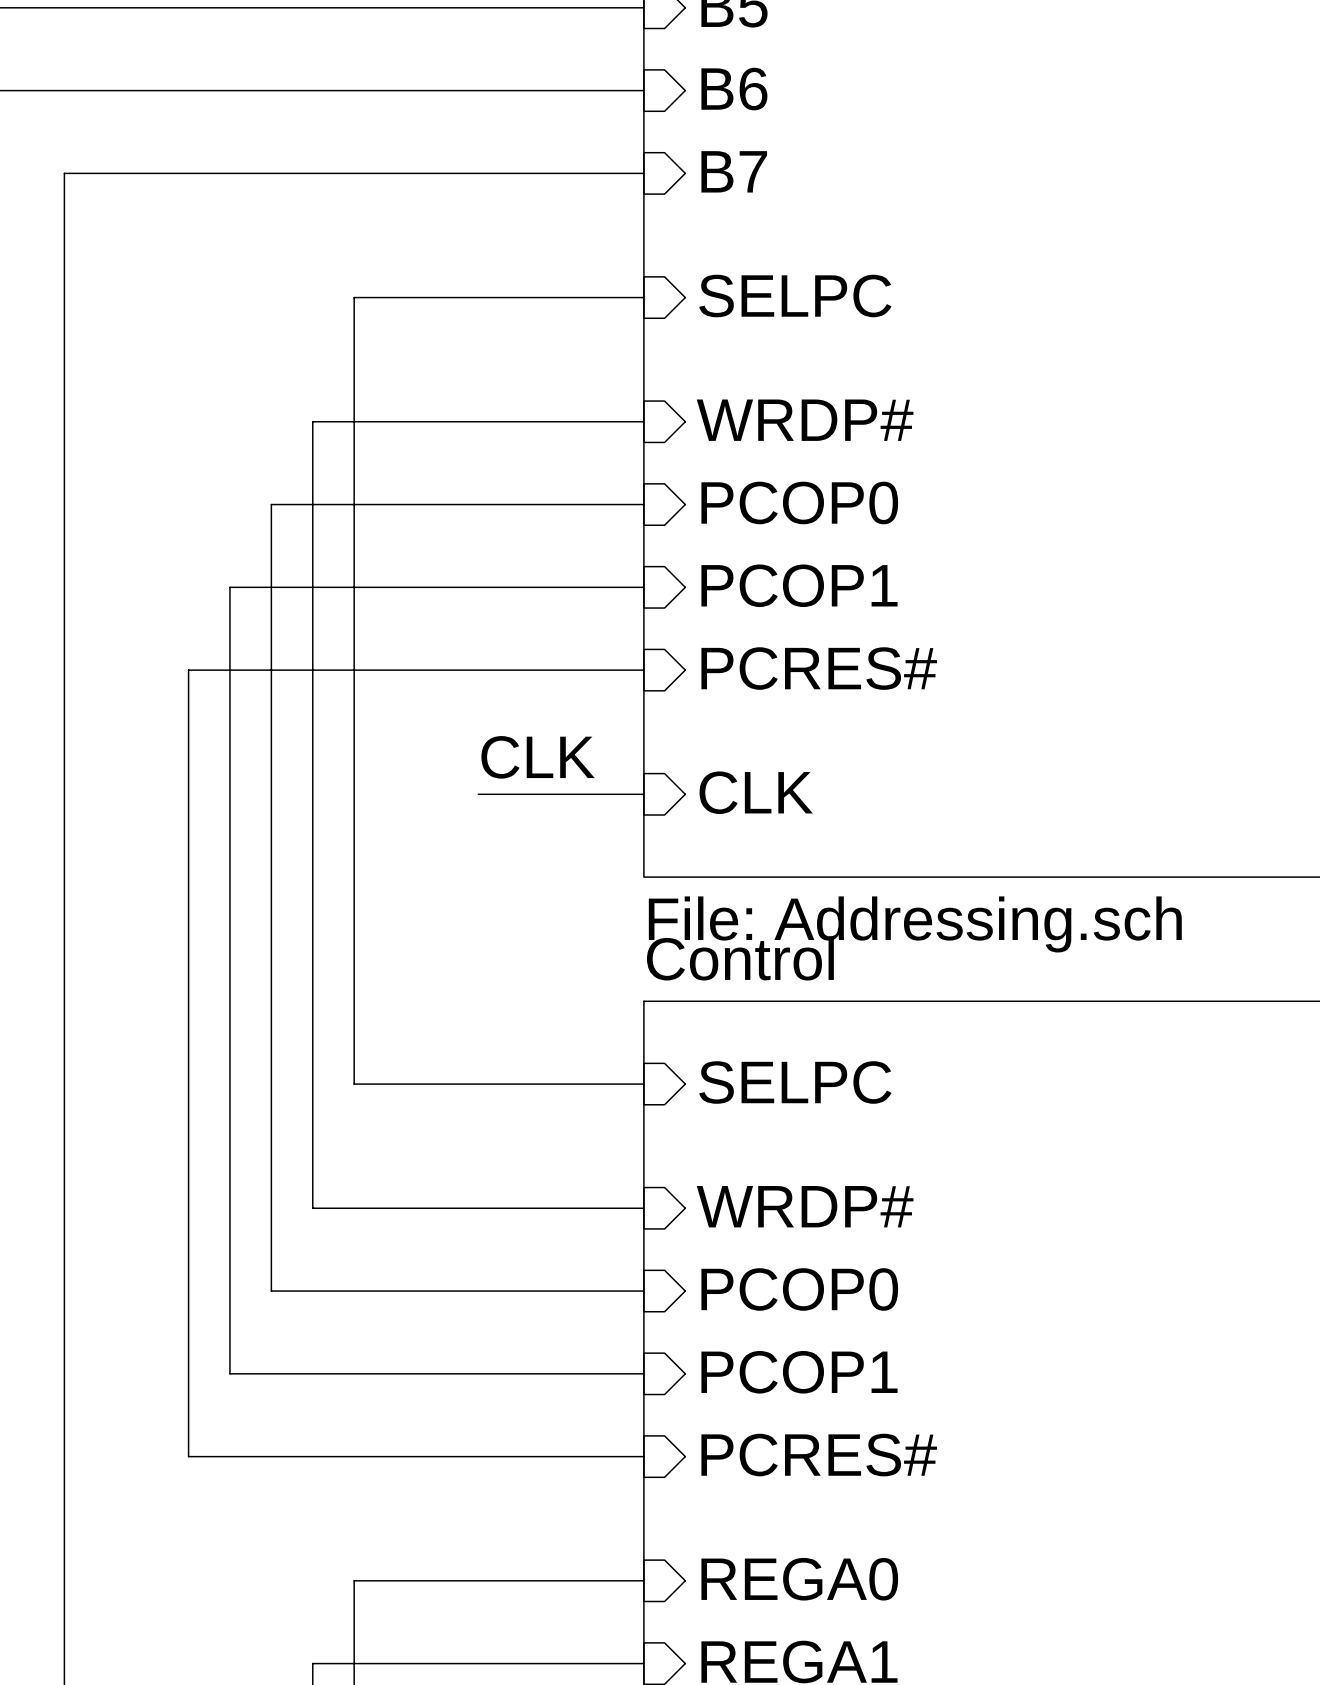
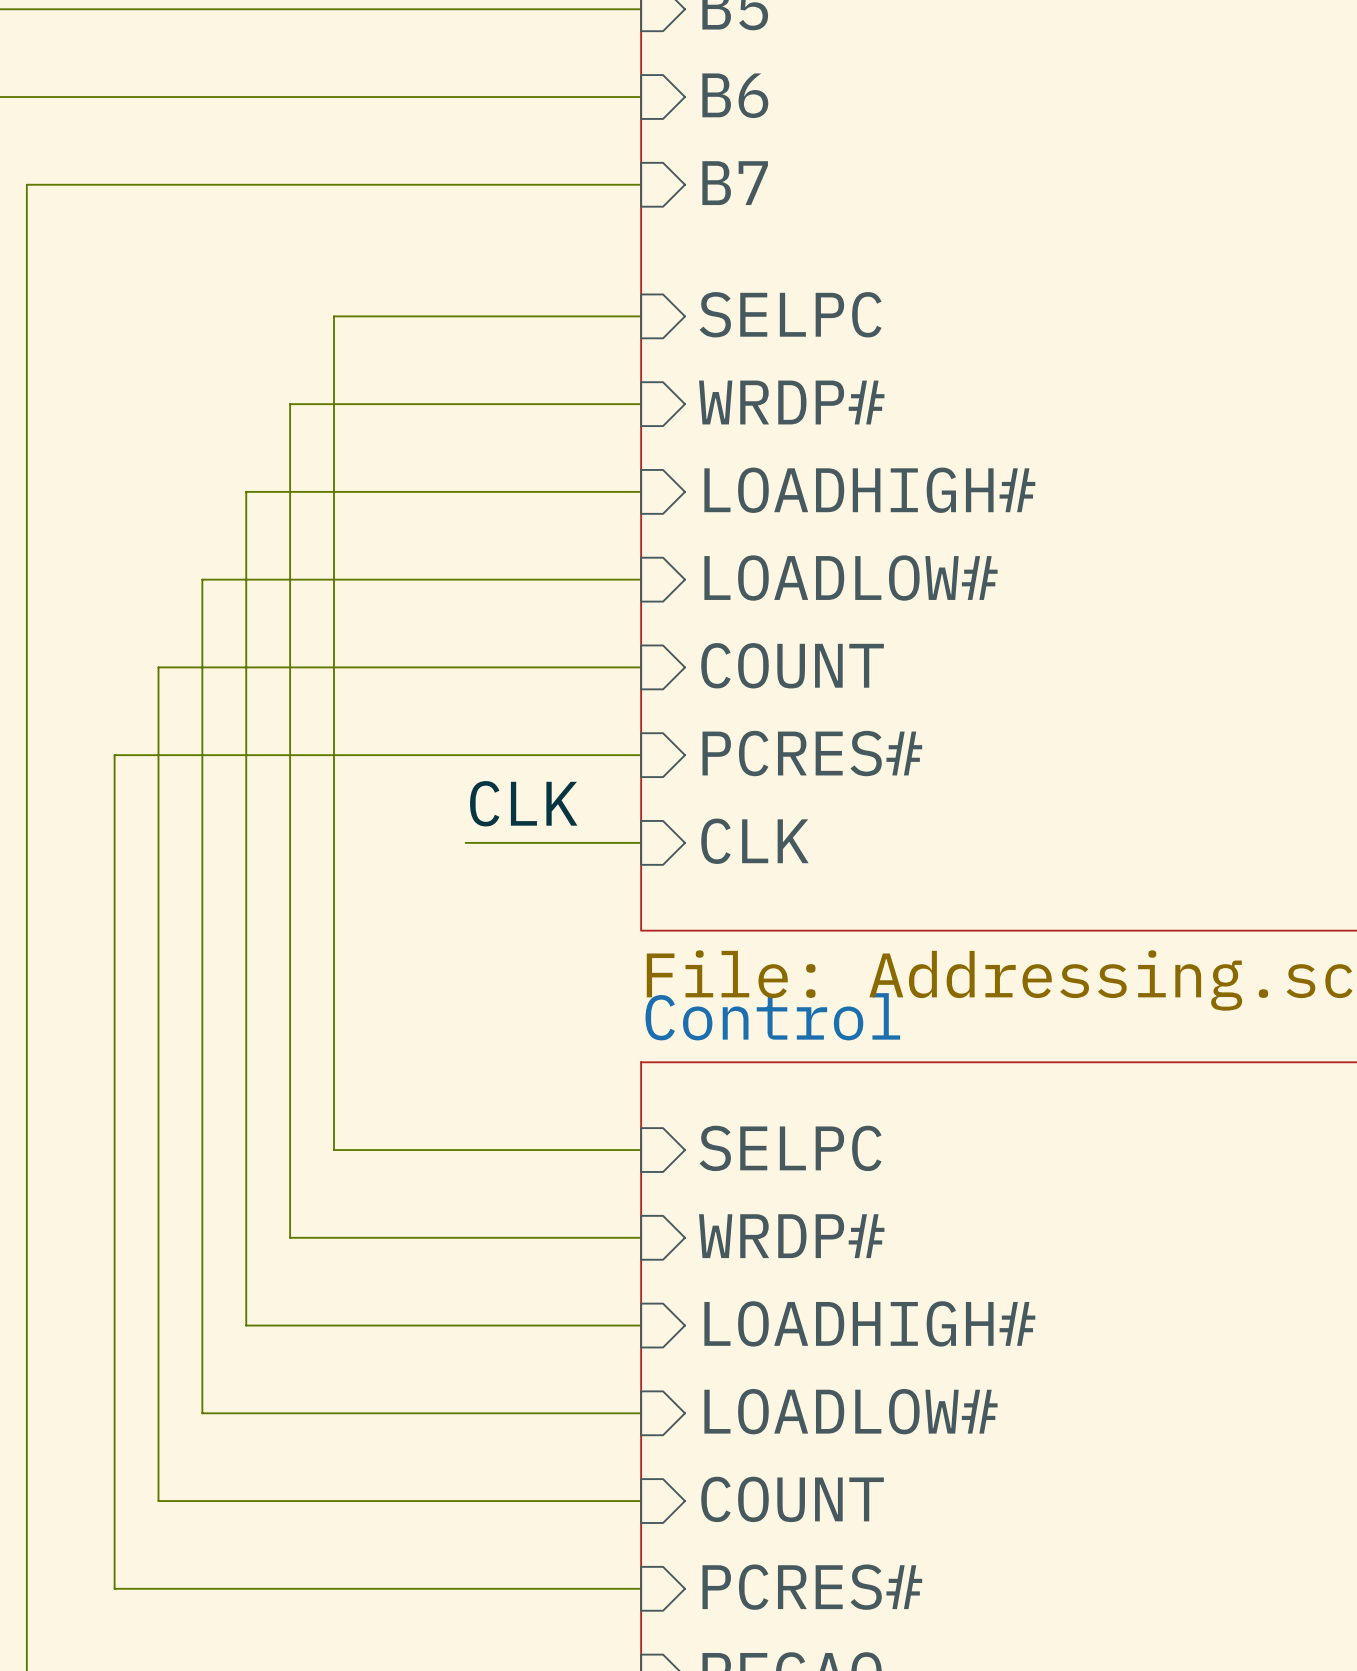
sheet pin position: WRDP# (805, 420) -> WRDP# (791, 402)
wire: (312, 421) (643, 421) -> (290, 448) (290, 404) (641, 404)
sheet pin: none -> LOADHIGH# (869, 490)
sheet pin: PCOP0 (799, 502) -> none
wire: (271, 504) (643, 504) -> (246, 535) (246, 491) (641, 491)
sheet pin: none -> LOADLOW# (850, 578)
sheet pin: PCOP1 (799, 585) -> none
wire: (229, 587) (643, 587) -> (202, 623) (202, 579) (641, 579)
sheet pin: none -> COUNT (792, 665)
sheet pin position: PCRES# (819, 668) -> PCRES# (812, 753)
wire: (188, 670) (643, 670) -> (158, 711) (158, 667) (641, 667)
wire: none -> (641, 755) (114, 755) (114, 1588) (641, 1588)
wire: (312, 1166) (312, 1208) (643, 1208) -> (290, 1237) (641, 1237)
sheet pin position: WRDP# (805, 1206) -> WRDP# (791, 1236)
sheet pin: none -> LOADHIGH# (869, 1323)
wire: (271, 1249) (271, 1291) (643, 1291) -> (246, 1325) (641, 1325)
sheet pin: PCOP0 (799, 1289) -> none
sheet pin: none -> LOADLOW# (850, 1411)
wire: (229, 1332) (229, 1373) (643, 1373) -> (202, 1413) (641, 1413)
sheet pin: PCOP1 (799, 1372) -> none
sheet pin: none -> COUNT (792, 1499)
wire: (188, 1415) (188, 1456) (643, 1456) -> (158, 1501) (641, 1501)
sheet pin position: PCRES# (819, 1455) -> PCRES# (812, 1587)

